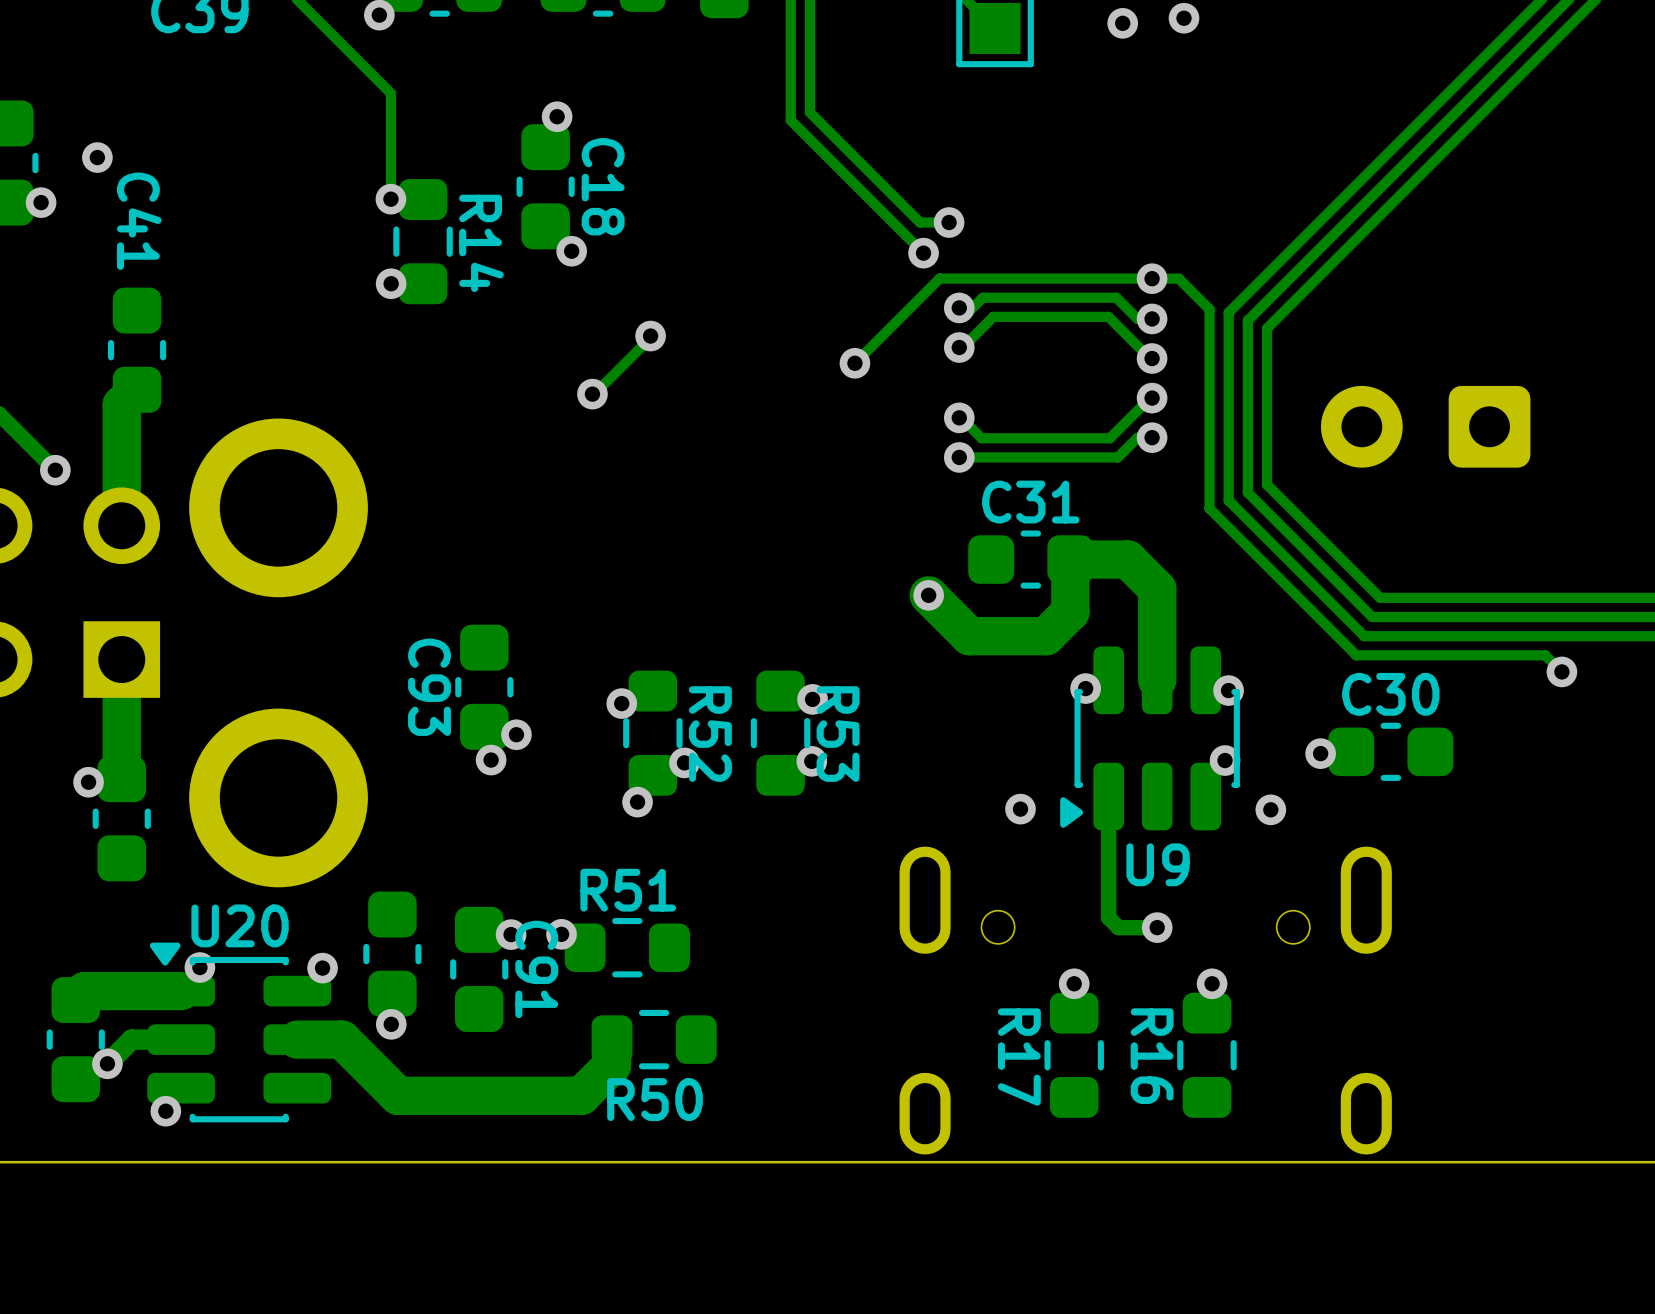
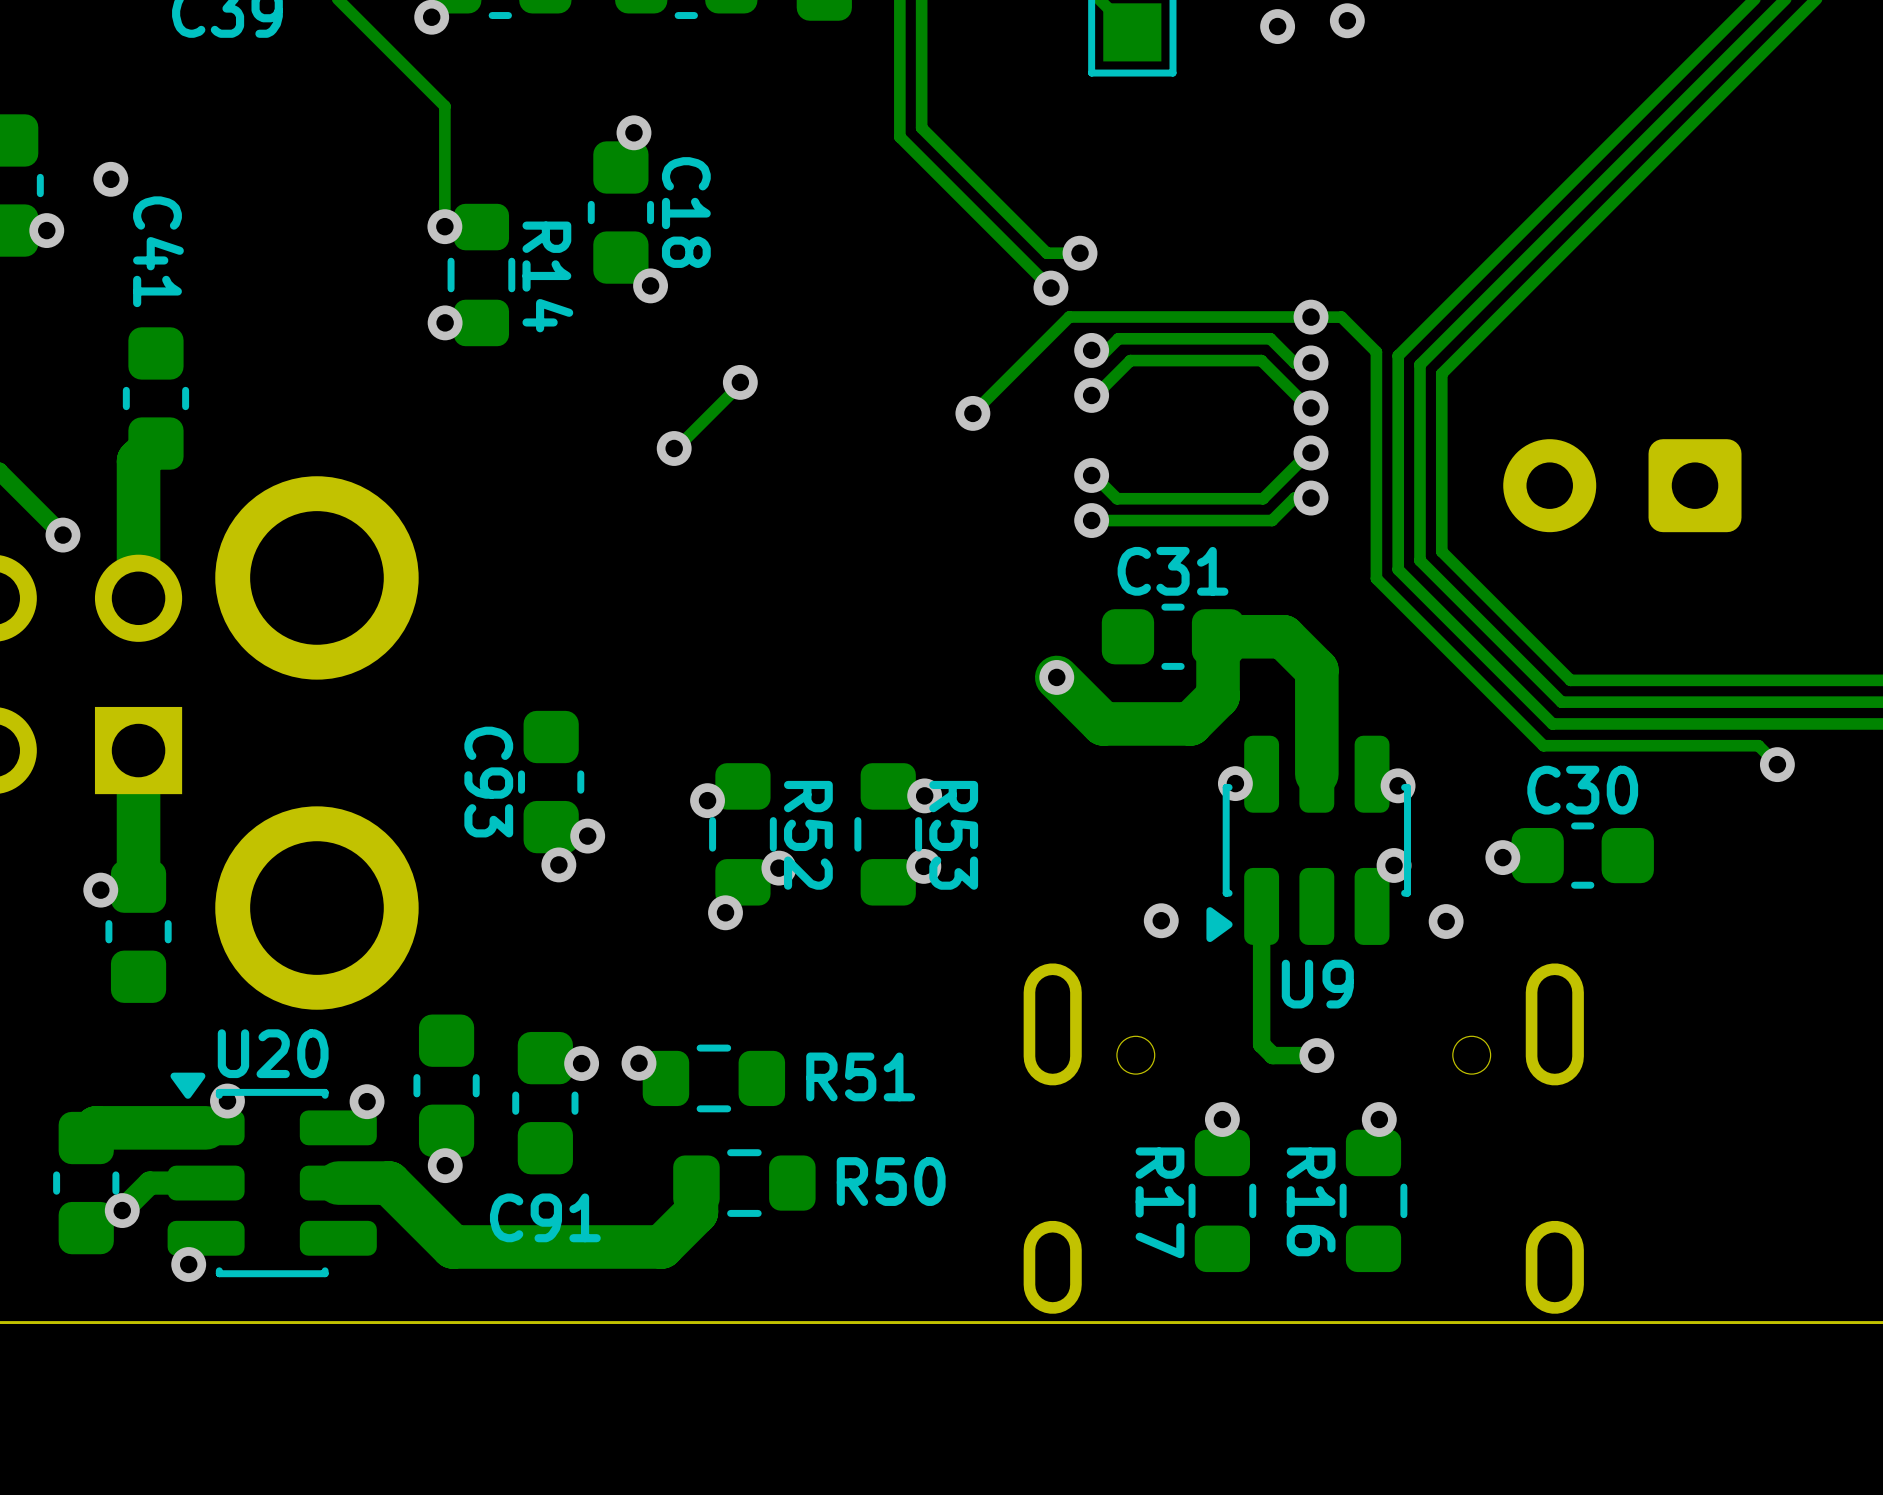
R51 name position: R51 (628, 890) -> R51 (860, 1076)
C91 name rotation: 0° (536, 969) -> 90° counterclockwise (545, 1217)
R50 name position: R50 (655, 1099) -> R50 (891, 1181)

